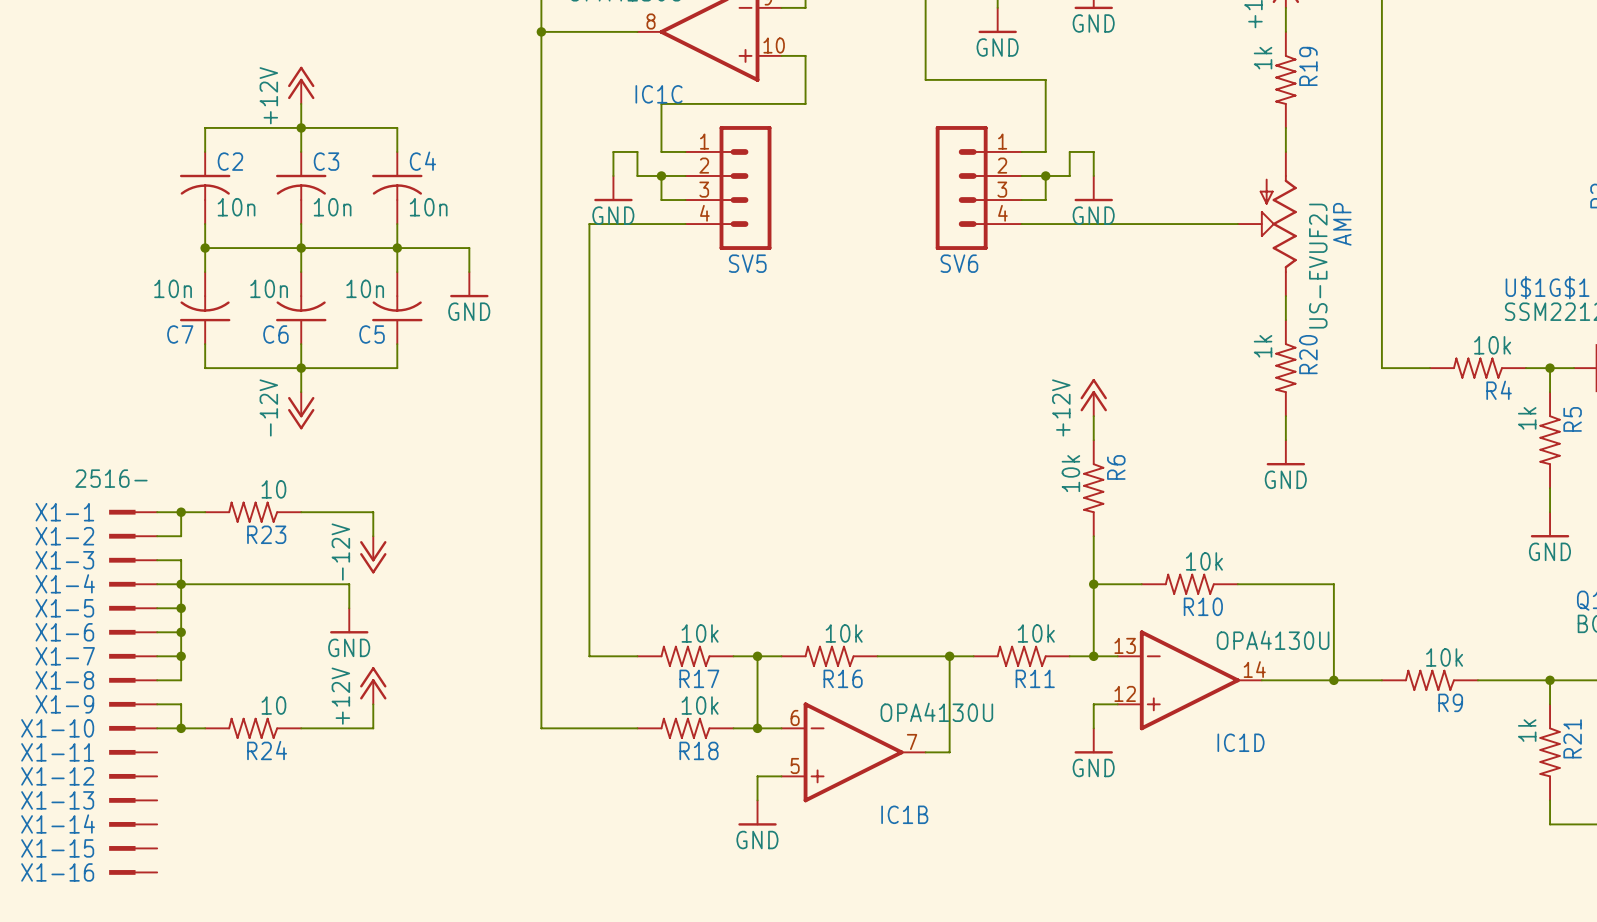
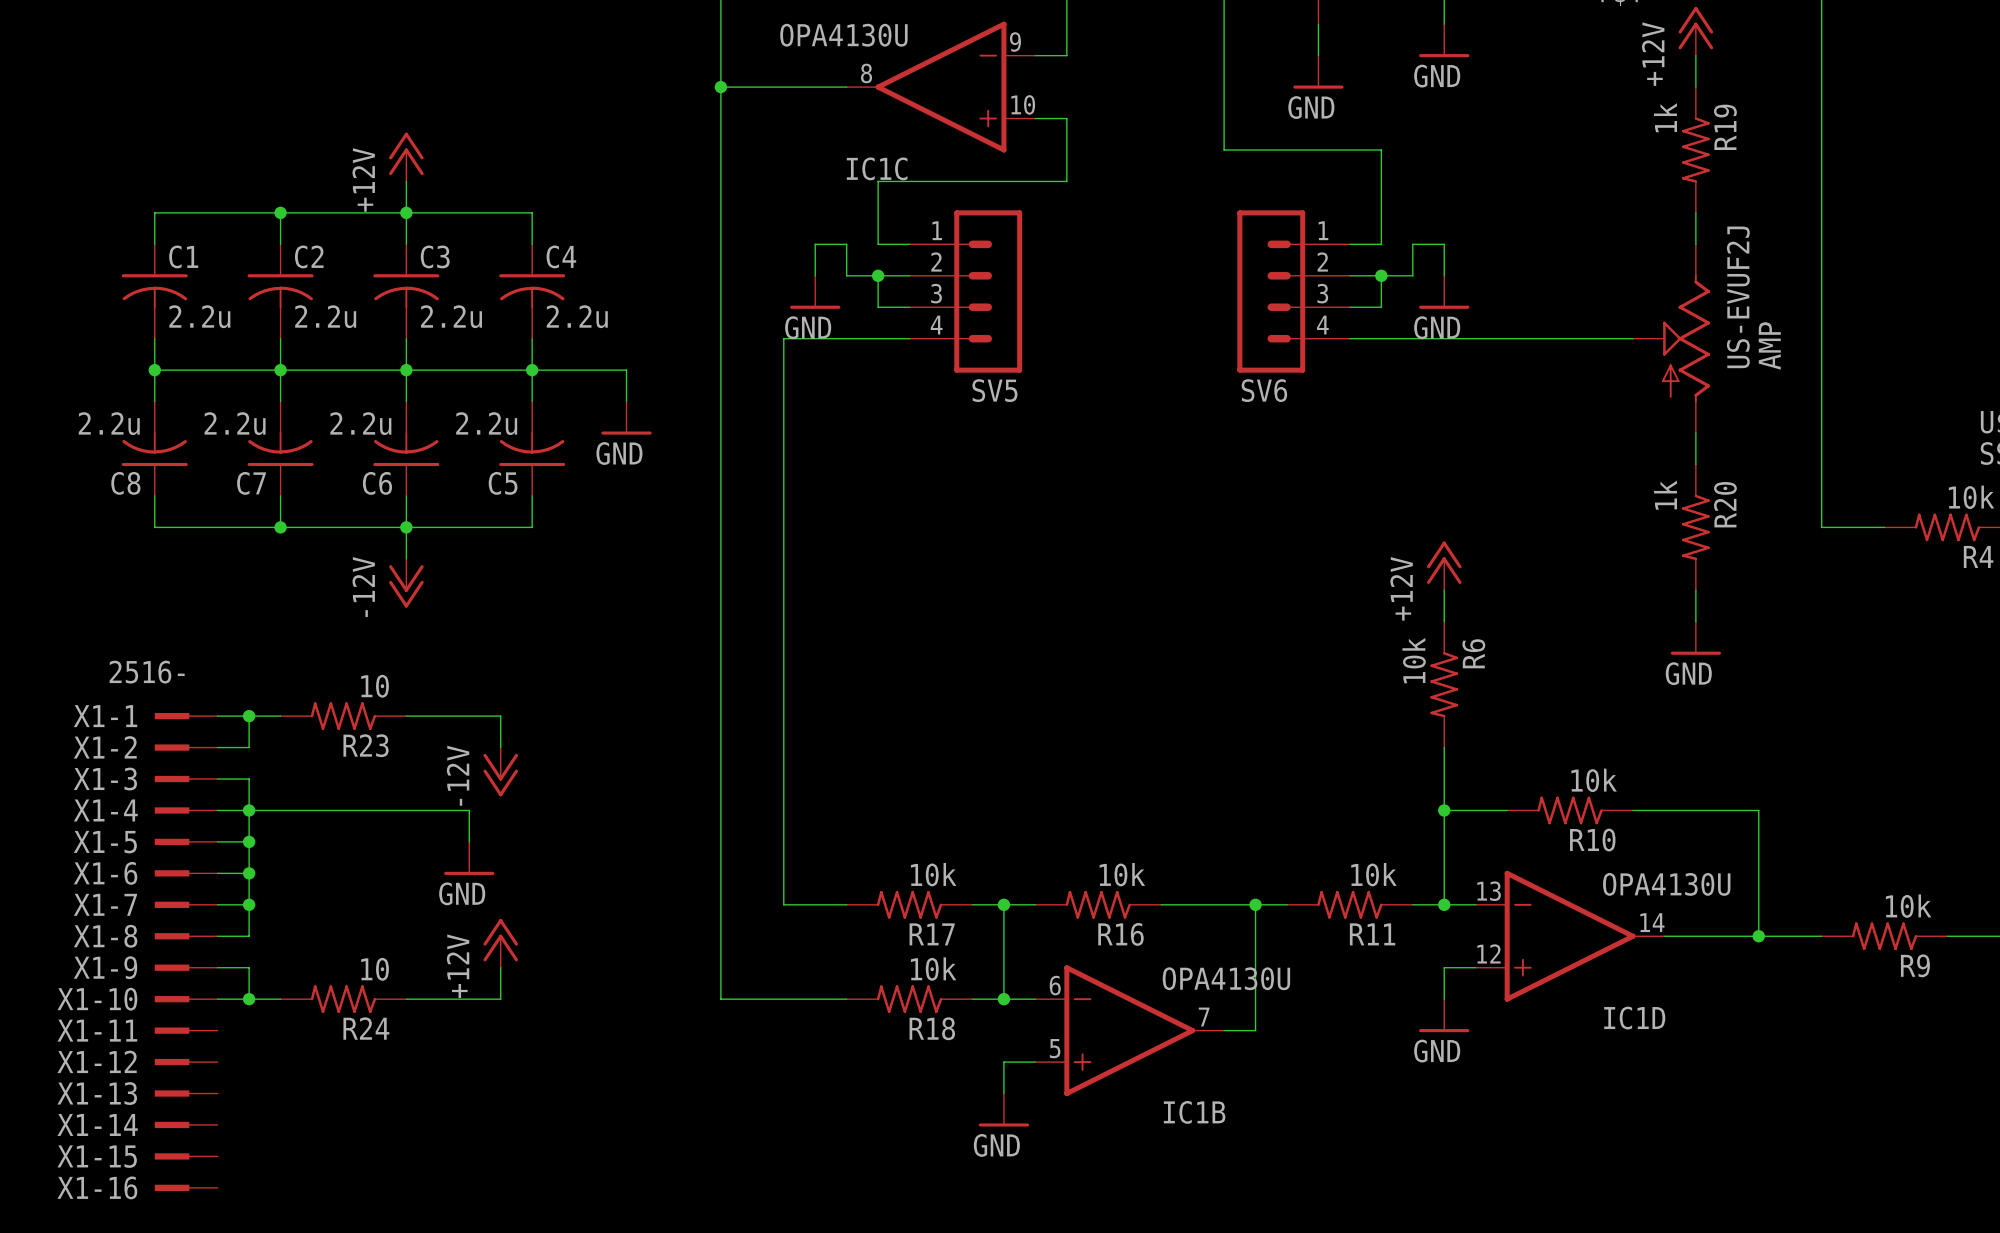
wire: none -> (280, 212) (154, 212) (154, 244)
junction: none -> (280, 212)
C1: none -> 2.2u (154, 291)
C2 value: 10n (236, 207) -> 2.2u (325, 316)
C3 value: 10n (332, 207) -> 2.2u (451, 316)
C4 value: 10n (428, 207) -> 2.2u (577, 316)
wire: none -> (154, 338) (154, 401)
AMP flip: as is (1278, 224) -> up-down (1685, 338)
wire: none -> (154, 370) (280, 370)
junction: none -> (154, 370)
C7 value: 10n (173, 288) -> 2.2u (235, 423)
C6 value: 10n (269, 288) -> 2.2u (360, 423)
C5 value: 10n (365, 288) -> 2.2u (486, 423)
C8: none -> 2.2u (154, 448)
wire: none -> (154, 495) (154, 527) (280, 527)
junction: none -> (280, 527)

